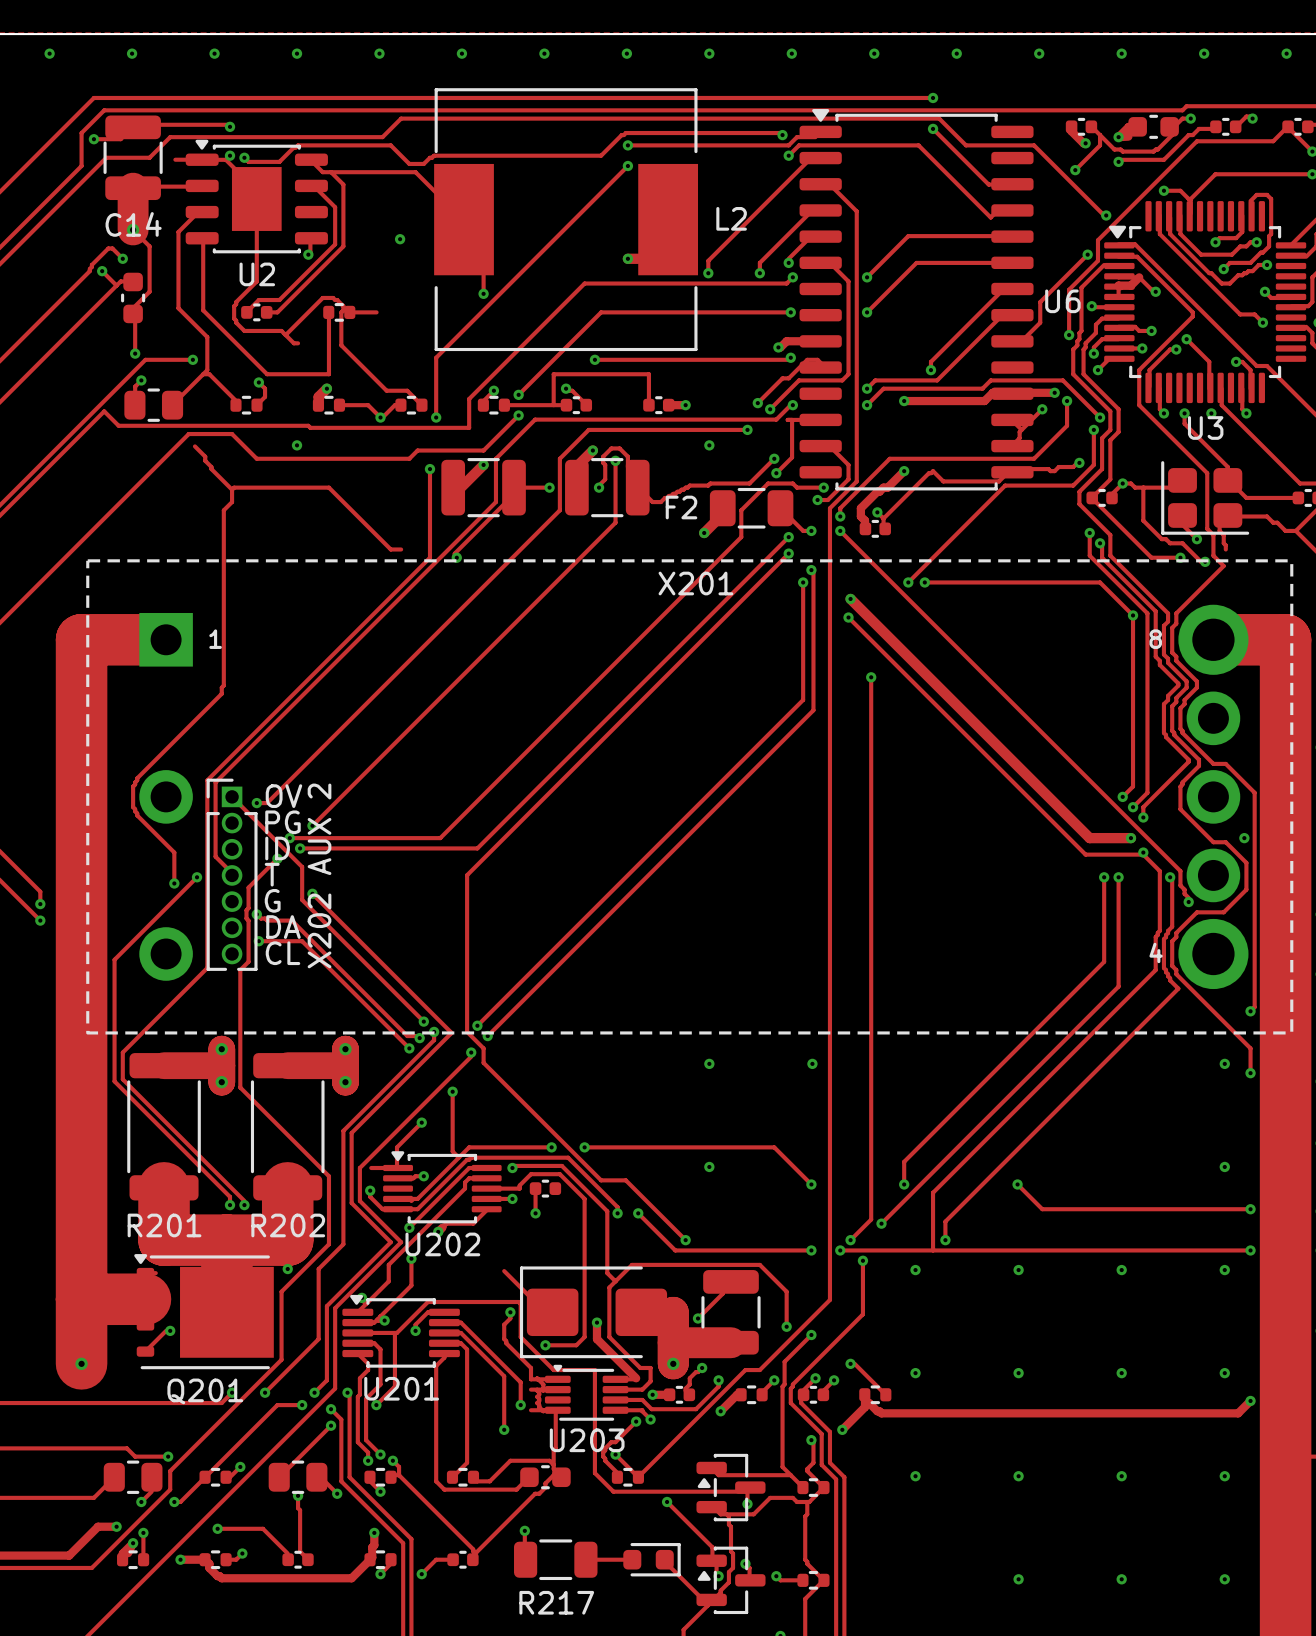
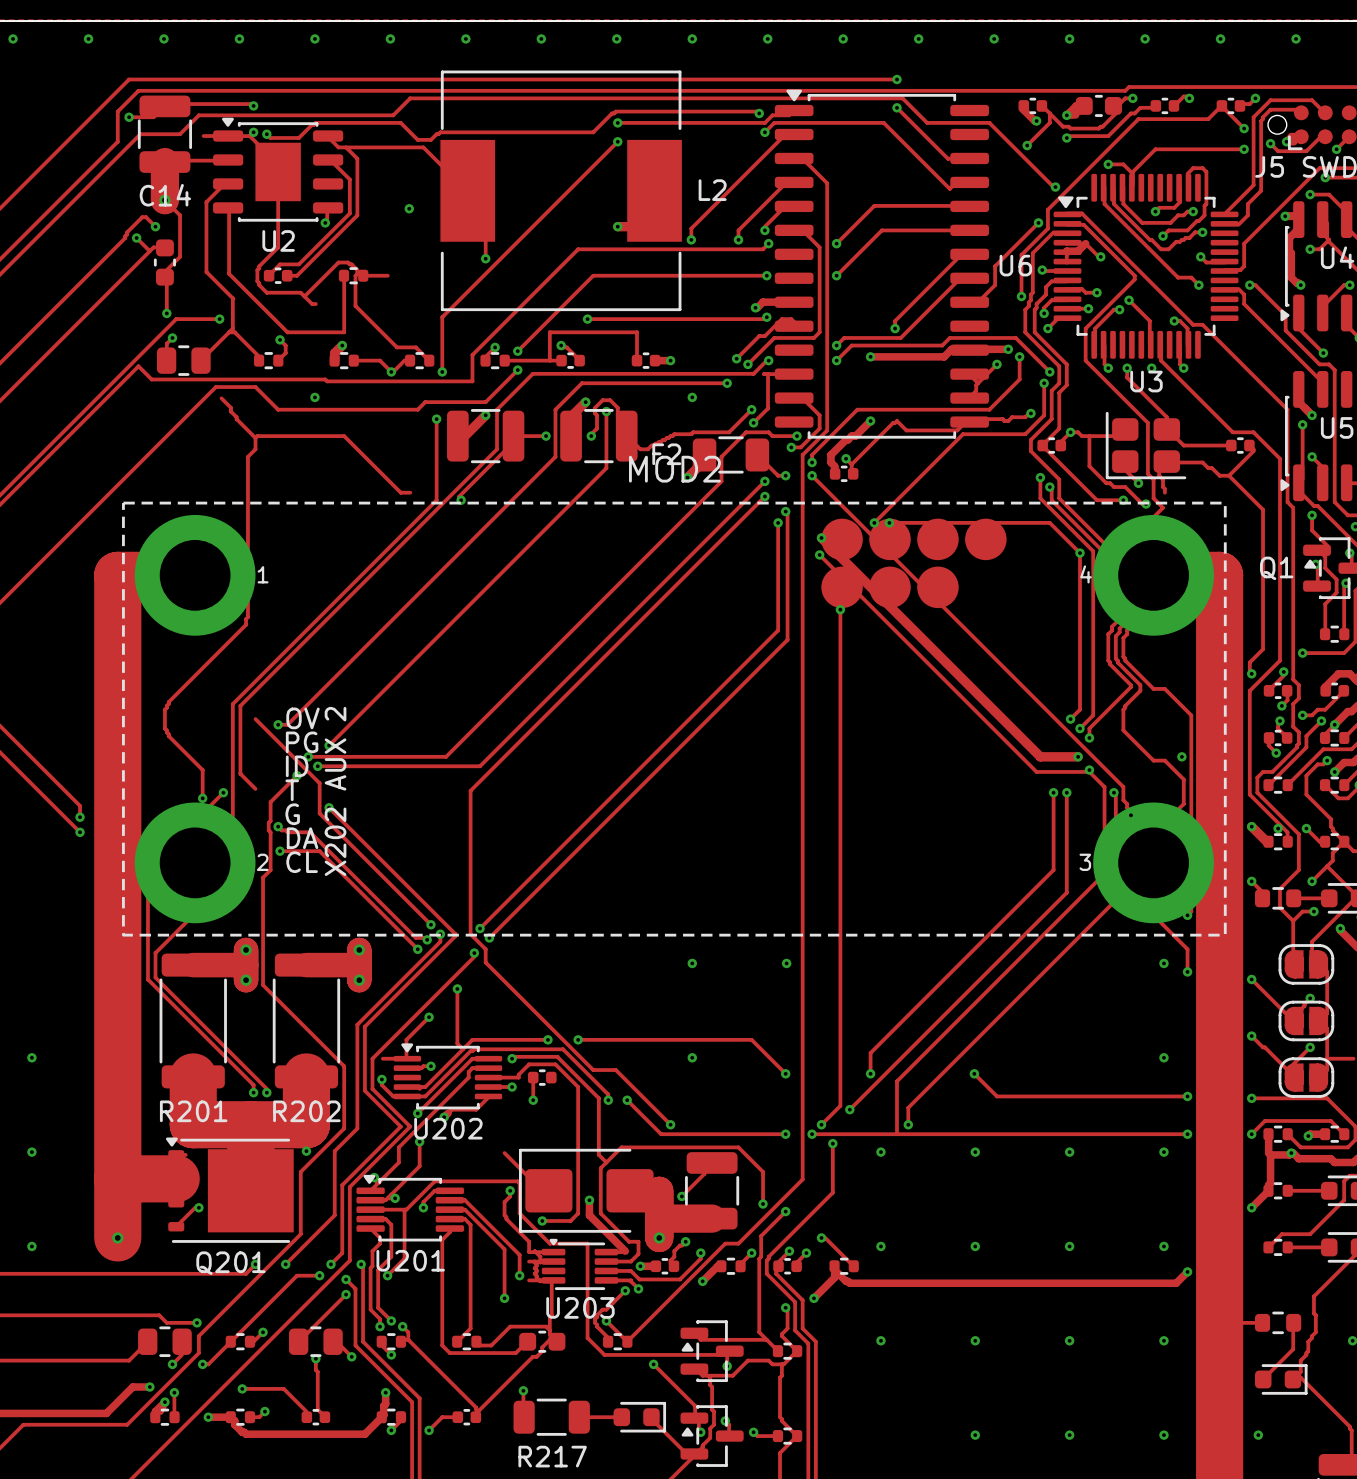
part: none -> (842, 539)
part: none -> (890, 539)
part: none -> (937, 539)
part: none -> (985, 539)
part: none -> (195, 575)
part: none -> (1153, 575)
part: none -> (842, 587)
part: none -> (890, 587)
part: none -> (937, 587)
X201: (689, 796) -> none
MOD2: none -> (674, 719)
part: (232, 874) -> none
part: none -> (195, 862)
part: none -> (1153, 862)

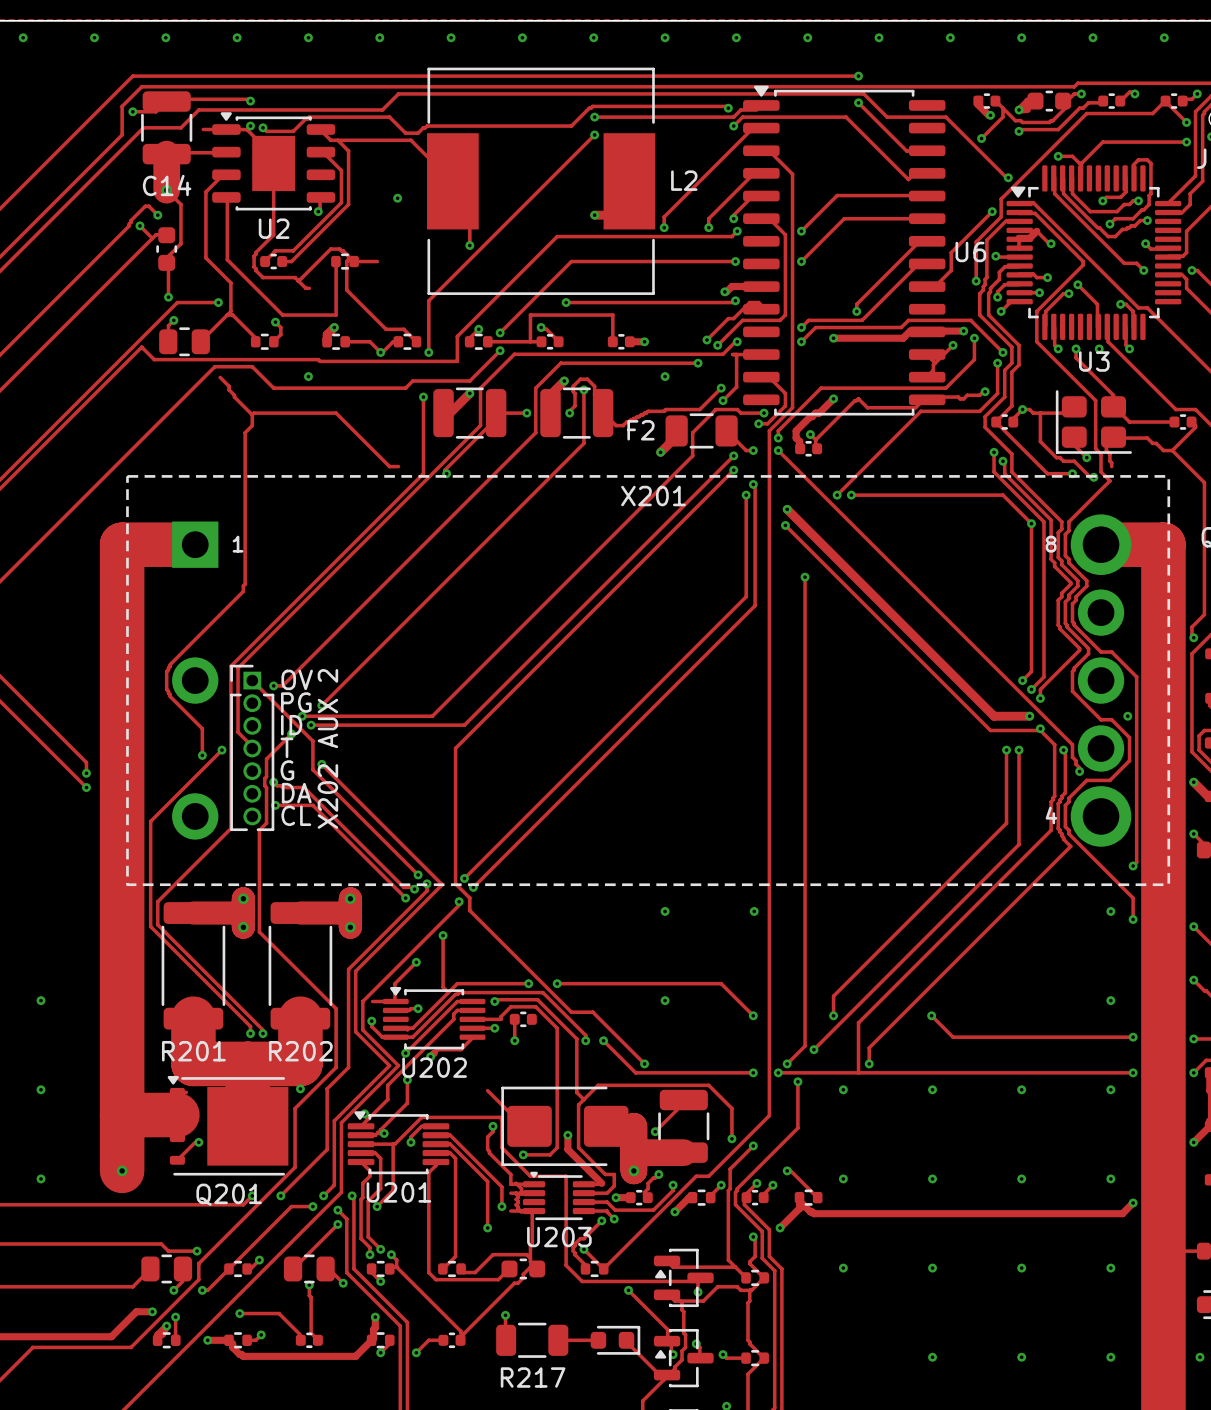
part: (842, 539) -> none
part: (890, 539) -> none
part: (937, 539) -> none
part: (985, 539) -> none
part: (195, 575) -> none
part: (1153, 575) -> none
part: (842, 587) -> none
part: (890, 587) -> none
part: (937, 587) -> none
MOD2: (674, 719) -> none
X201: none -> (648, 680)
part: none -> (252, 747)
part: (195, 862) -> none
part: (1153, 862) -> none

